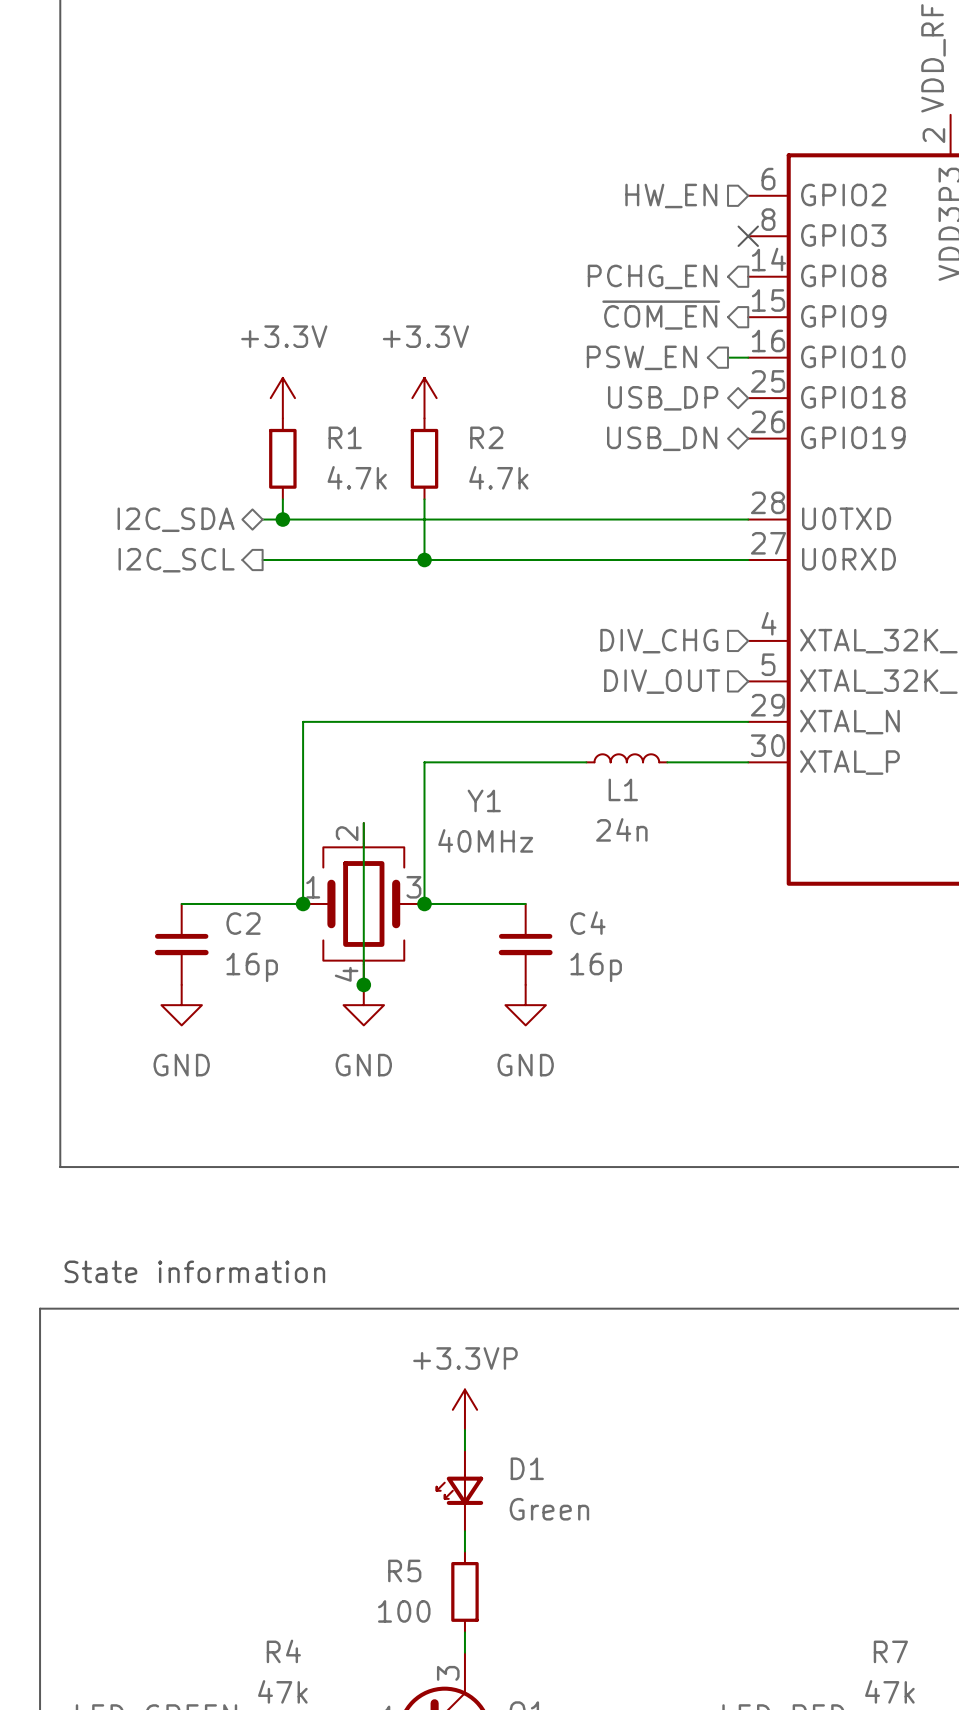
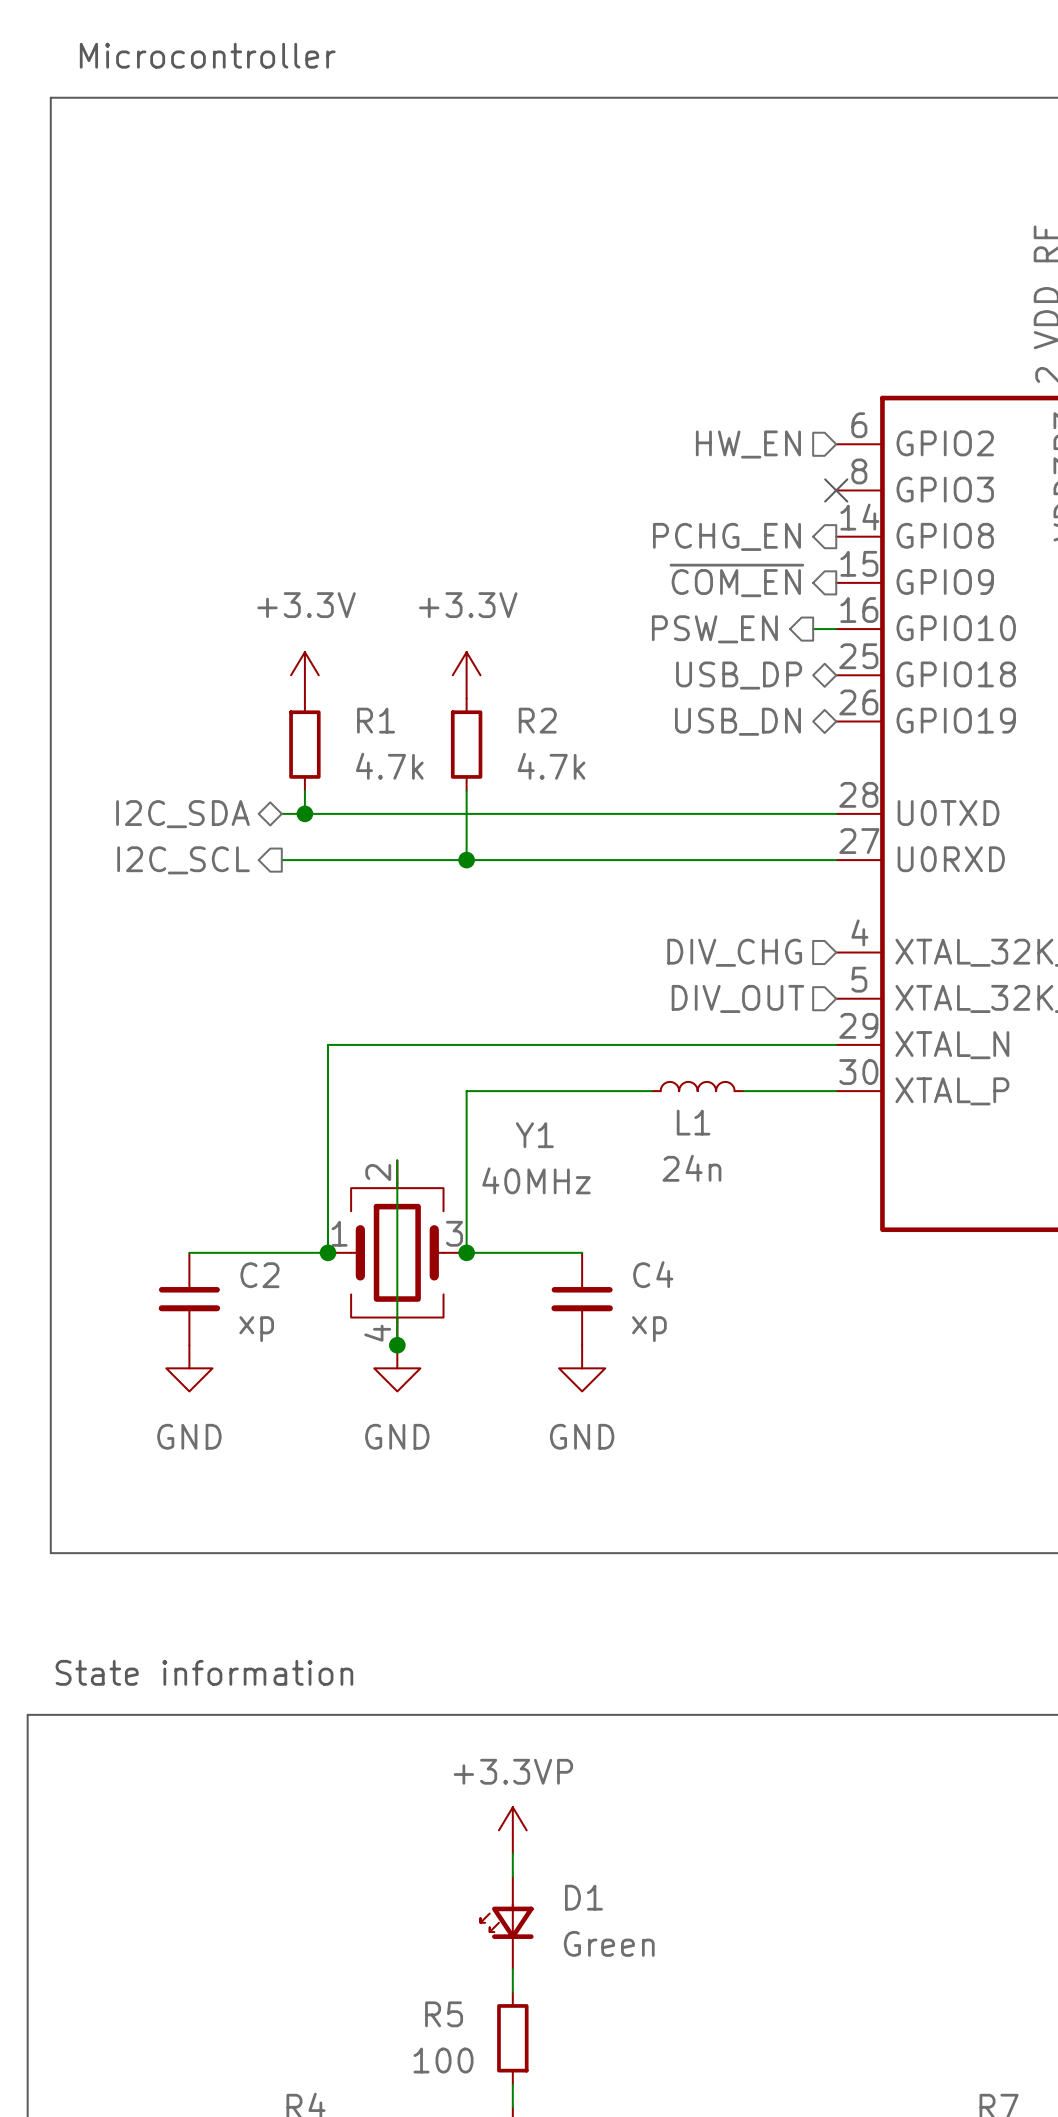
C2 value: 16p (252, 967) -> xp (256, 1329)
C4 value: 16p (596, 967) -> xp (649, 1329)

